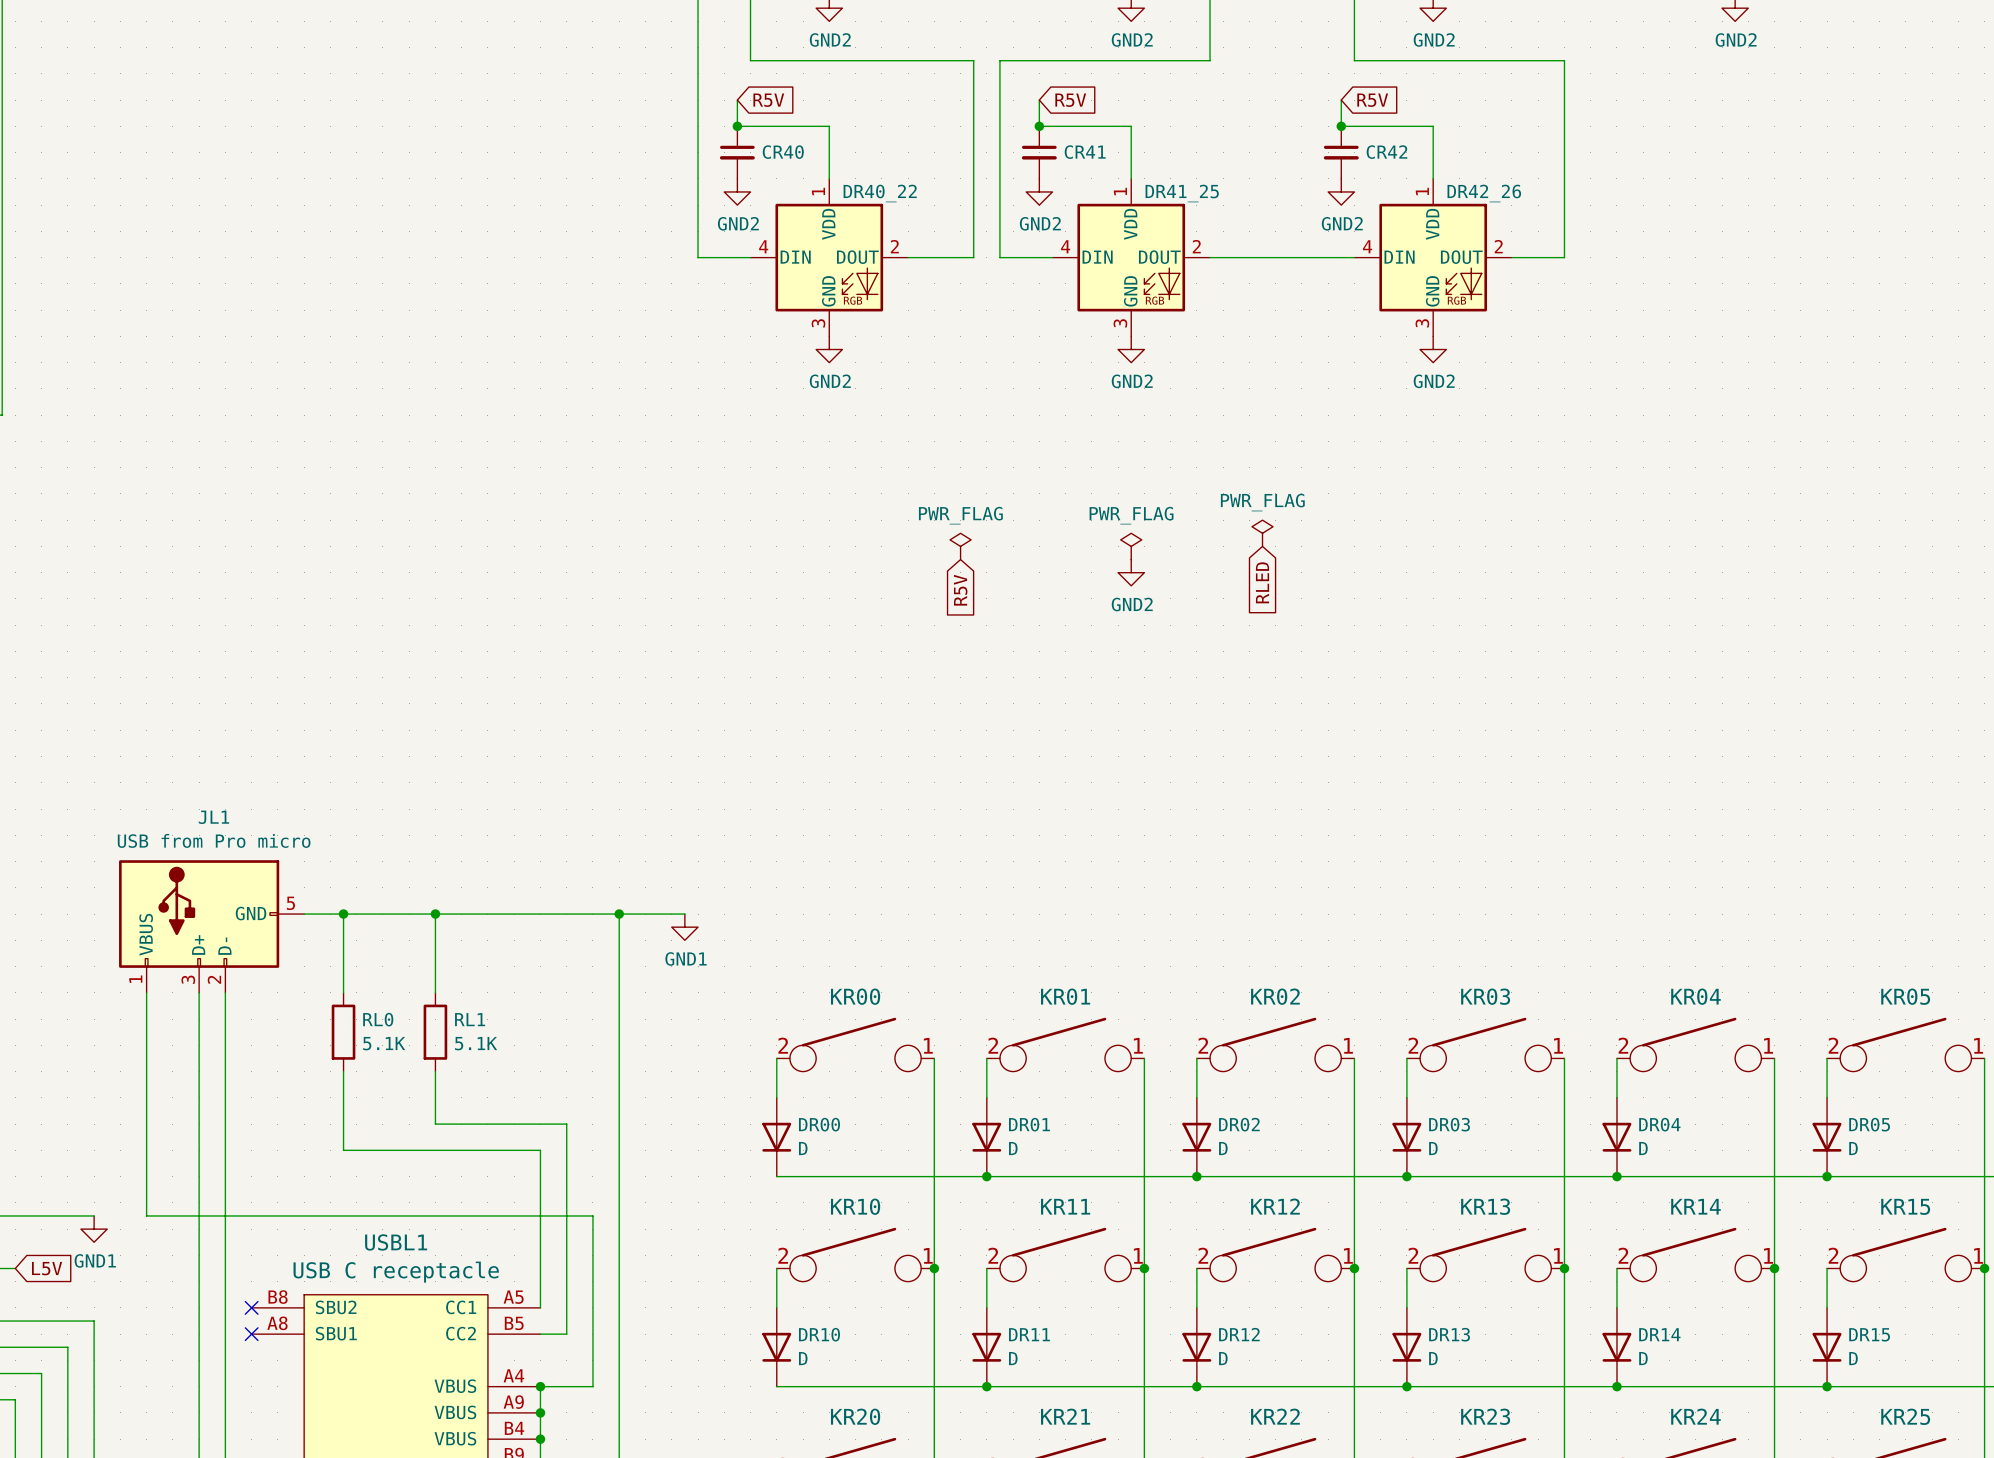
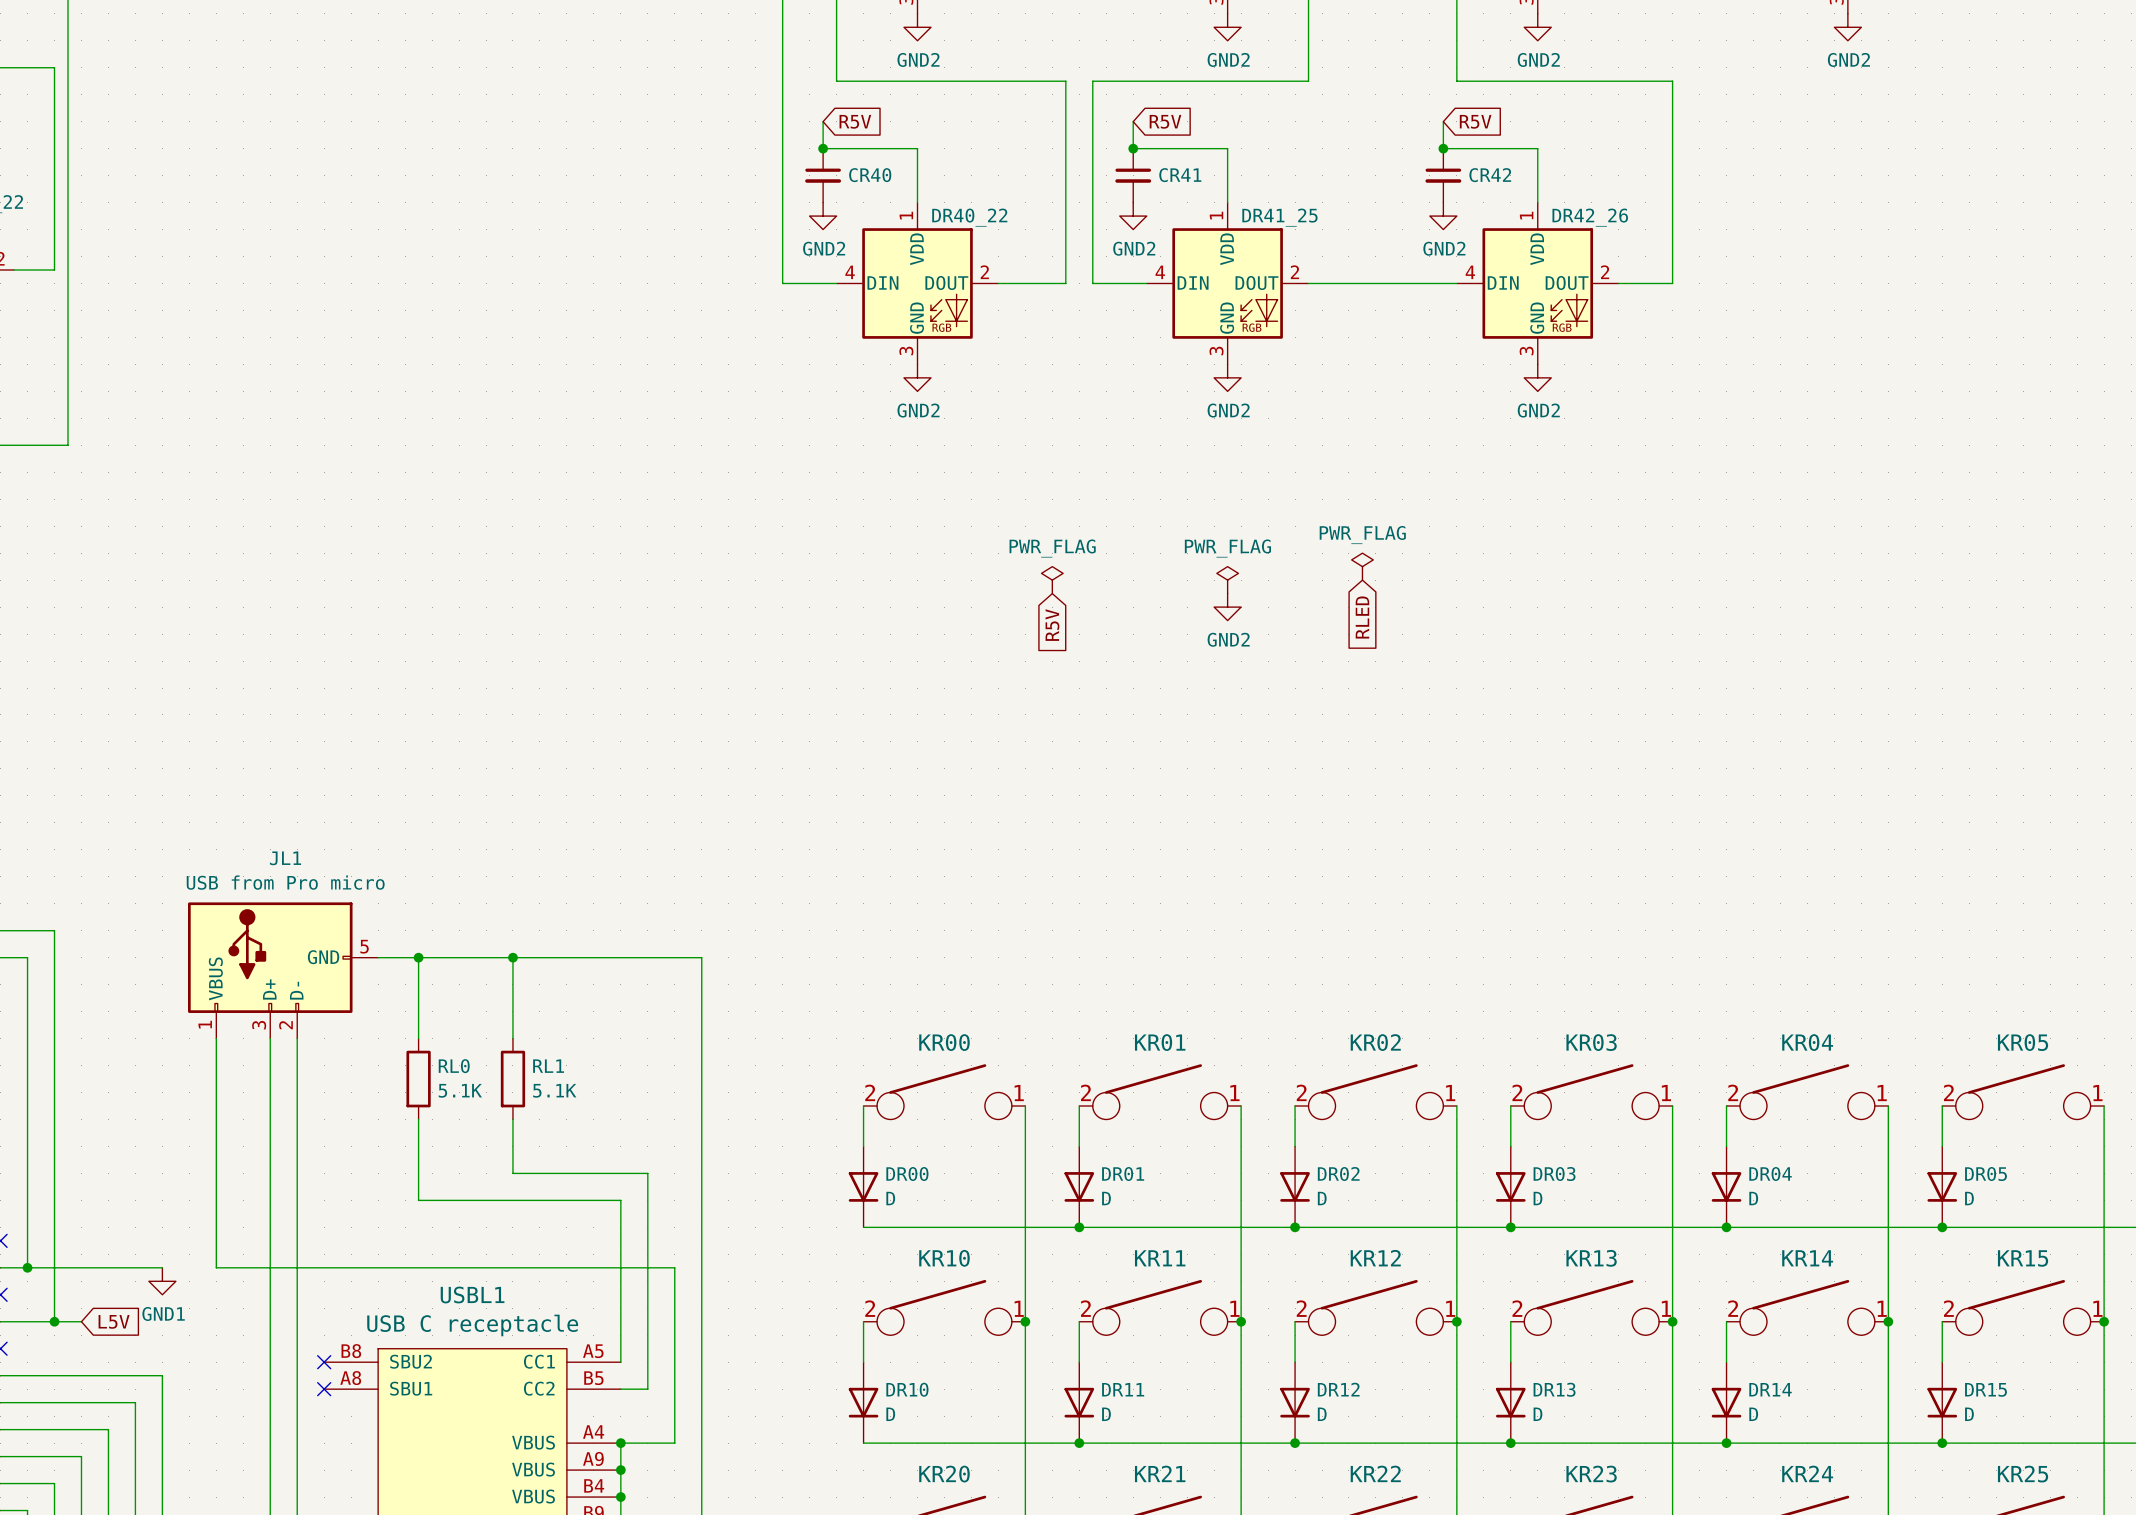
wire: (619, 914) (684, 914) -> none
junction: (619, 914) -> none
power symbol: GND1 (684, 927) -> none

